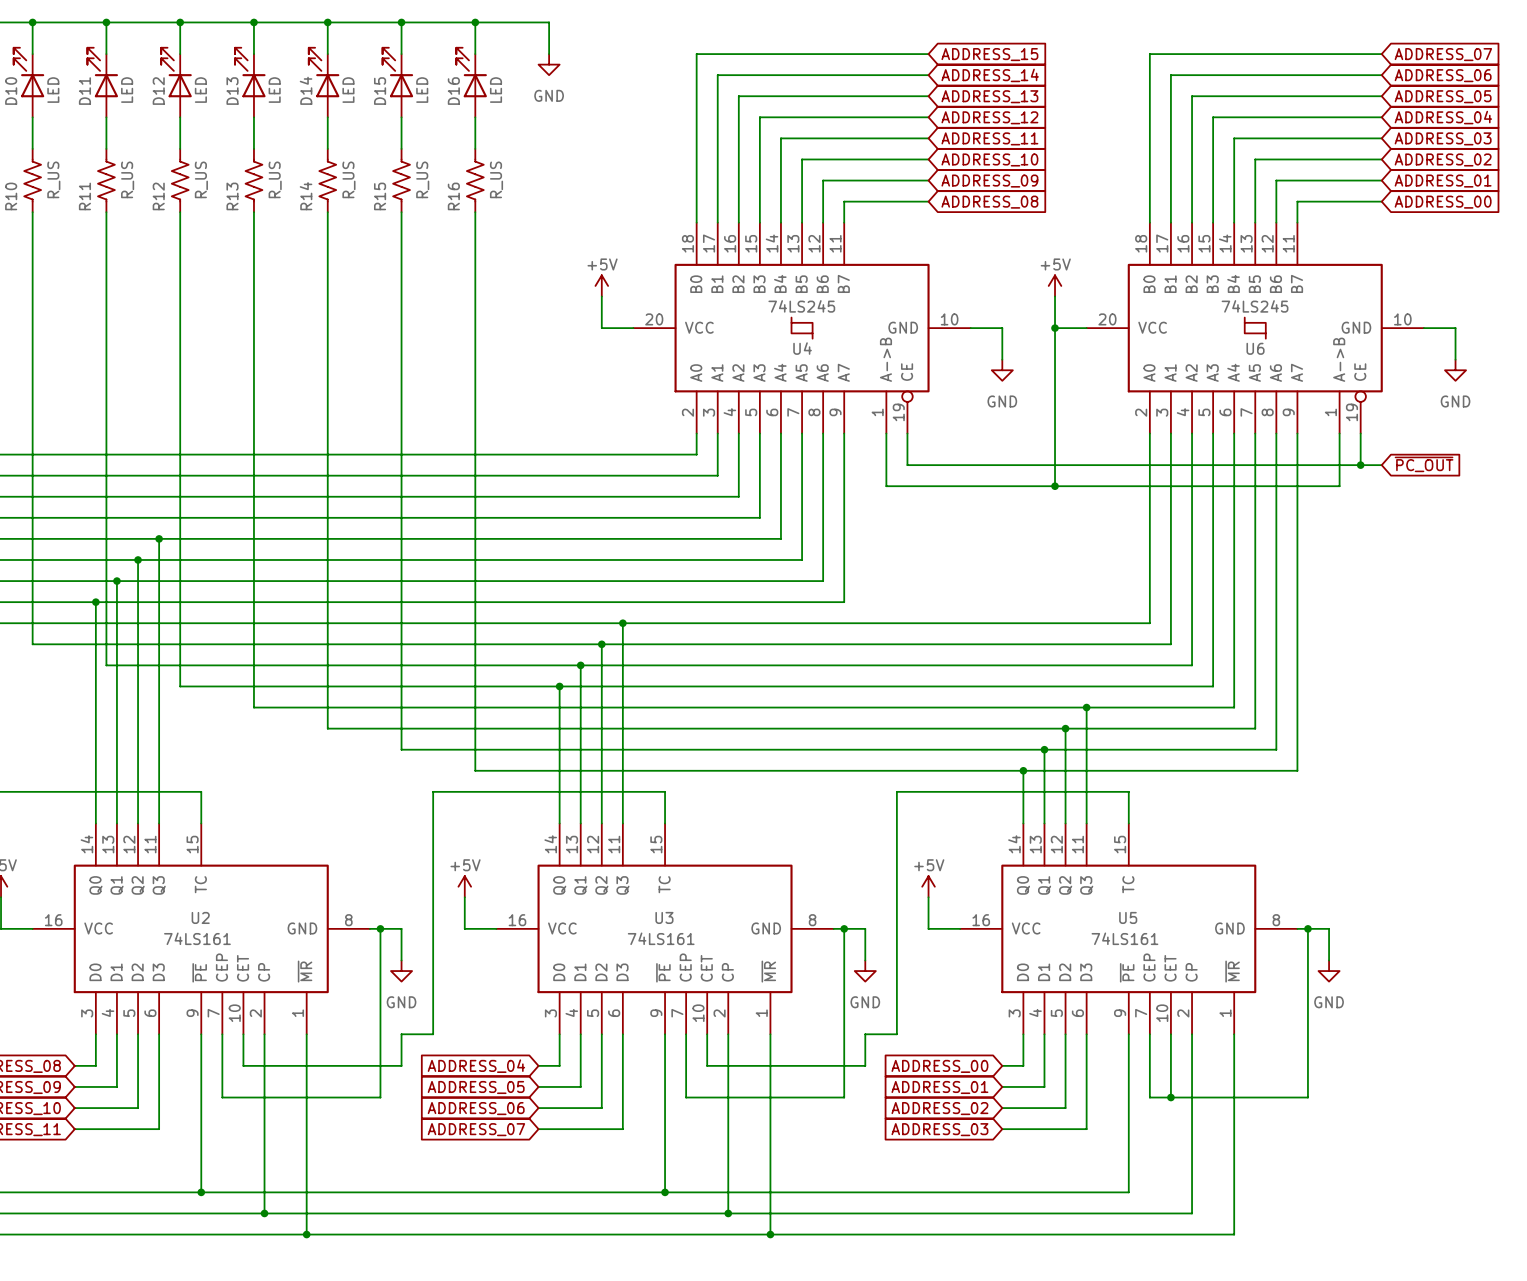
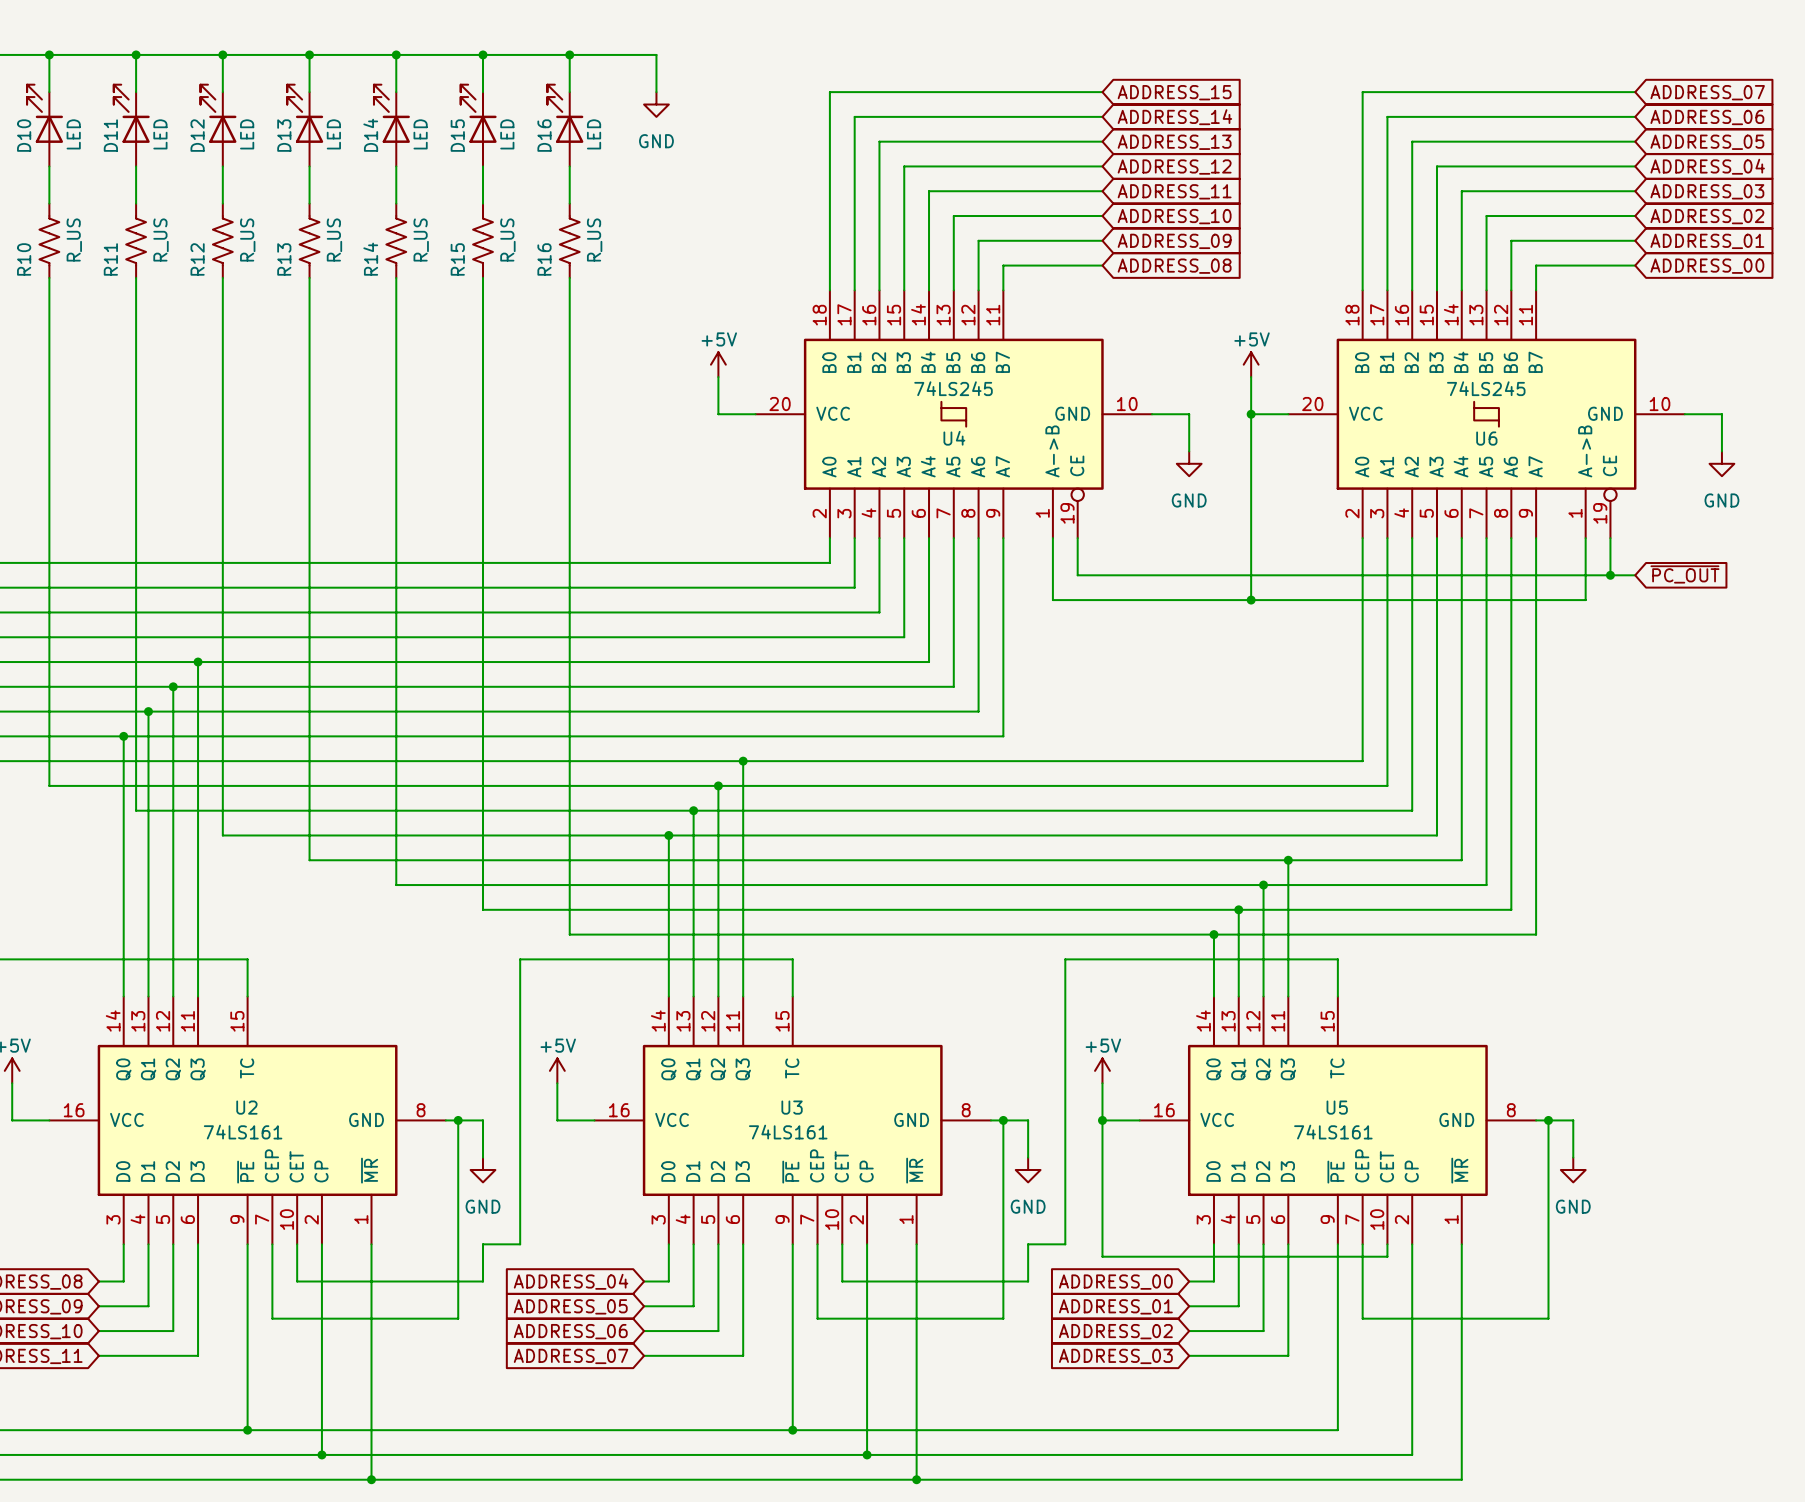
junction: none -> (1102, 1120)
wire: (1170, 1044) (1170, 1097) -> (1387, 1256) (1102, 1256) (1102, 1120)
junction: (1170, 1097) -> none

